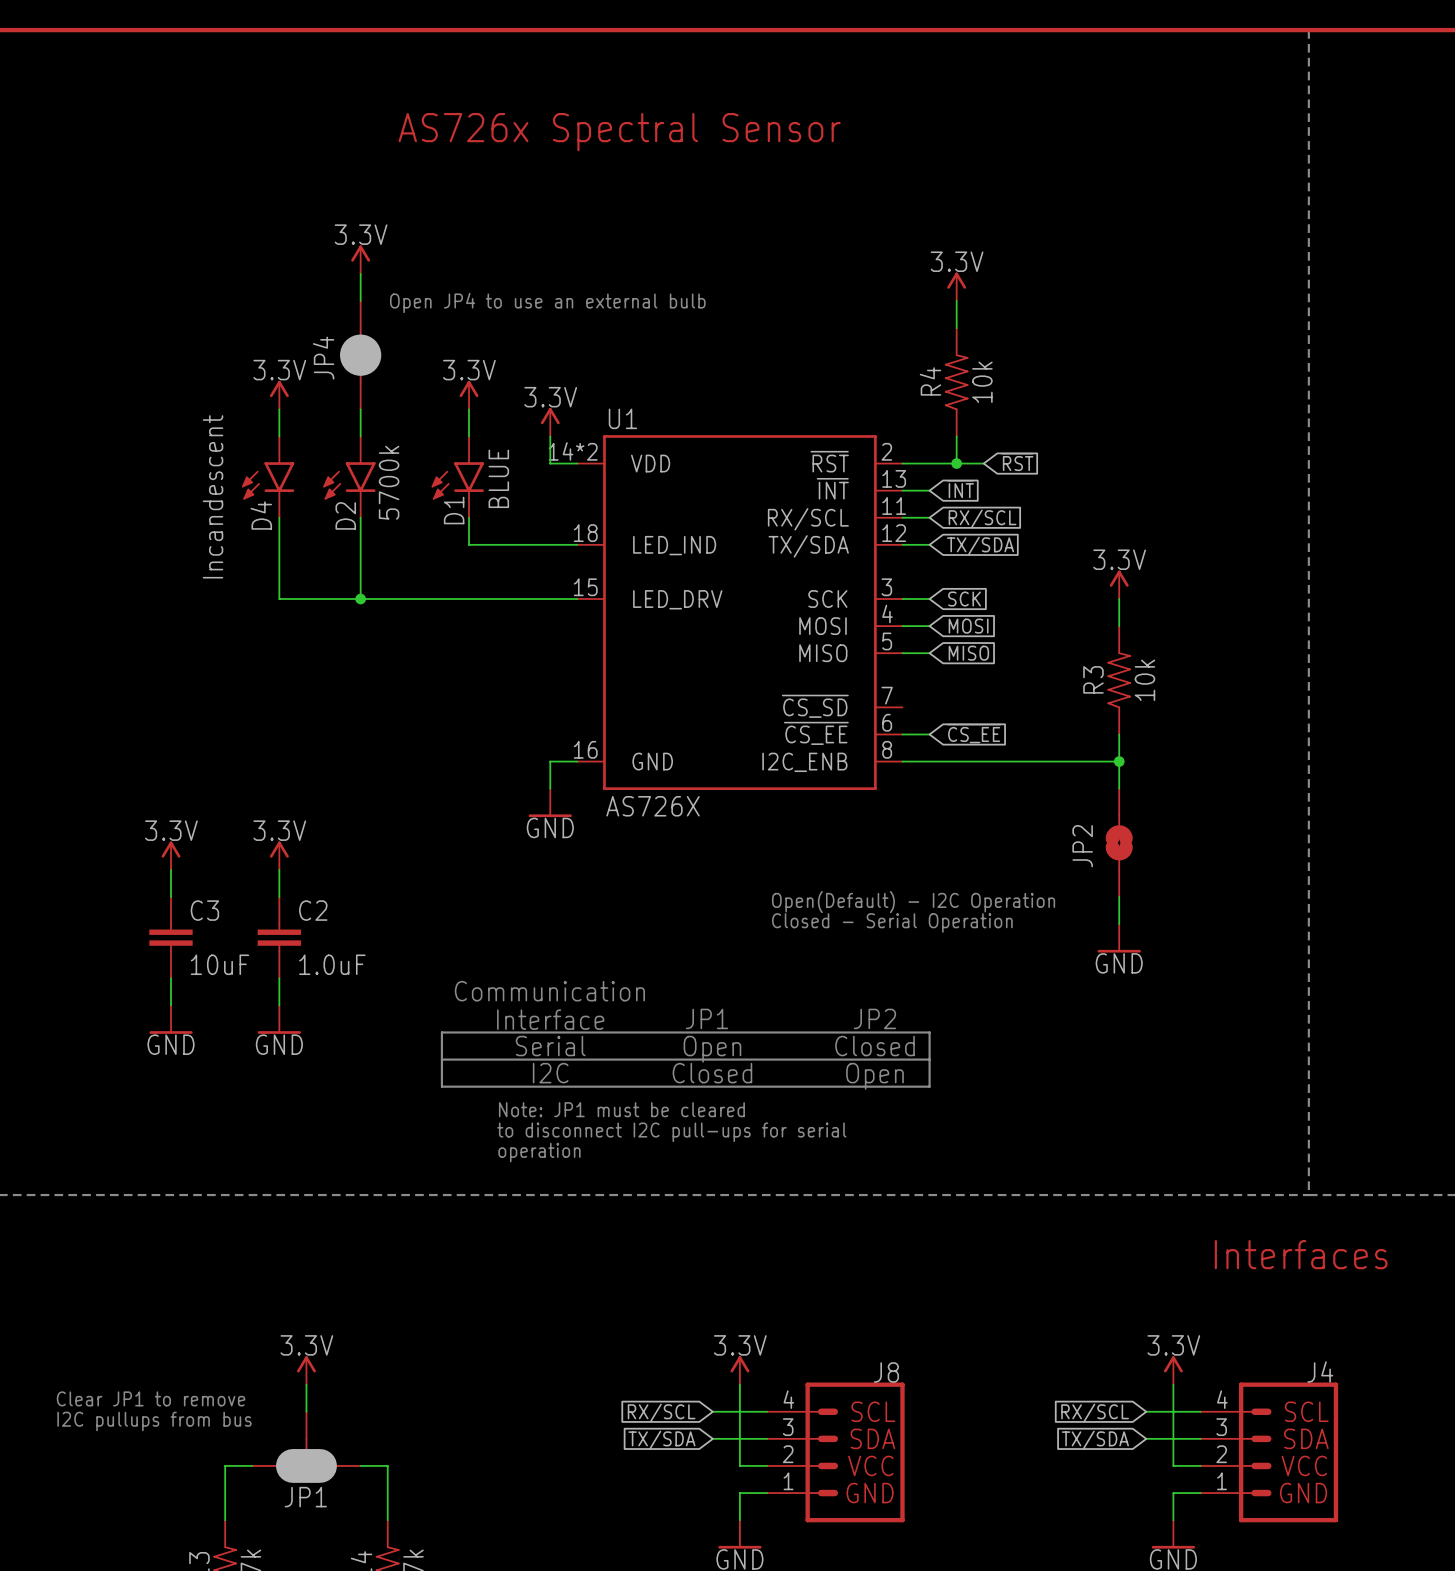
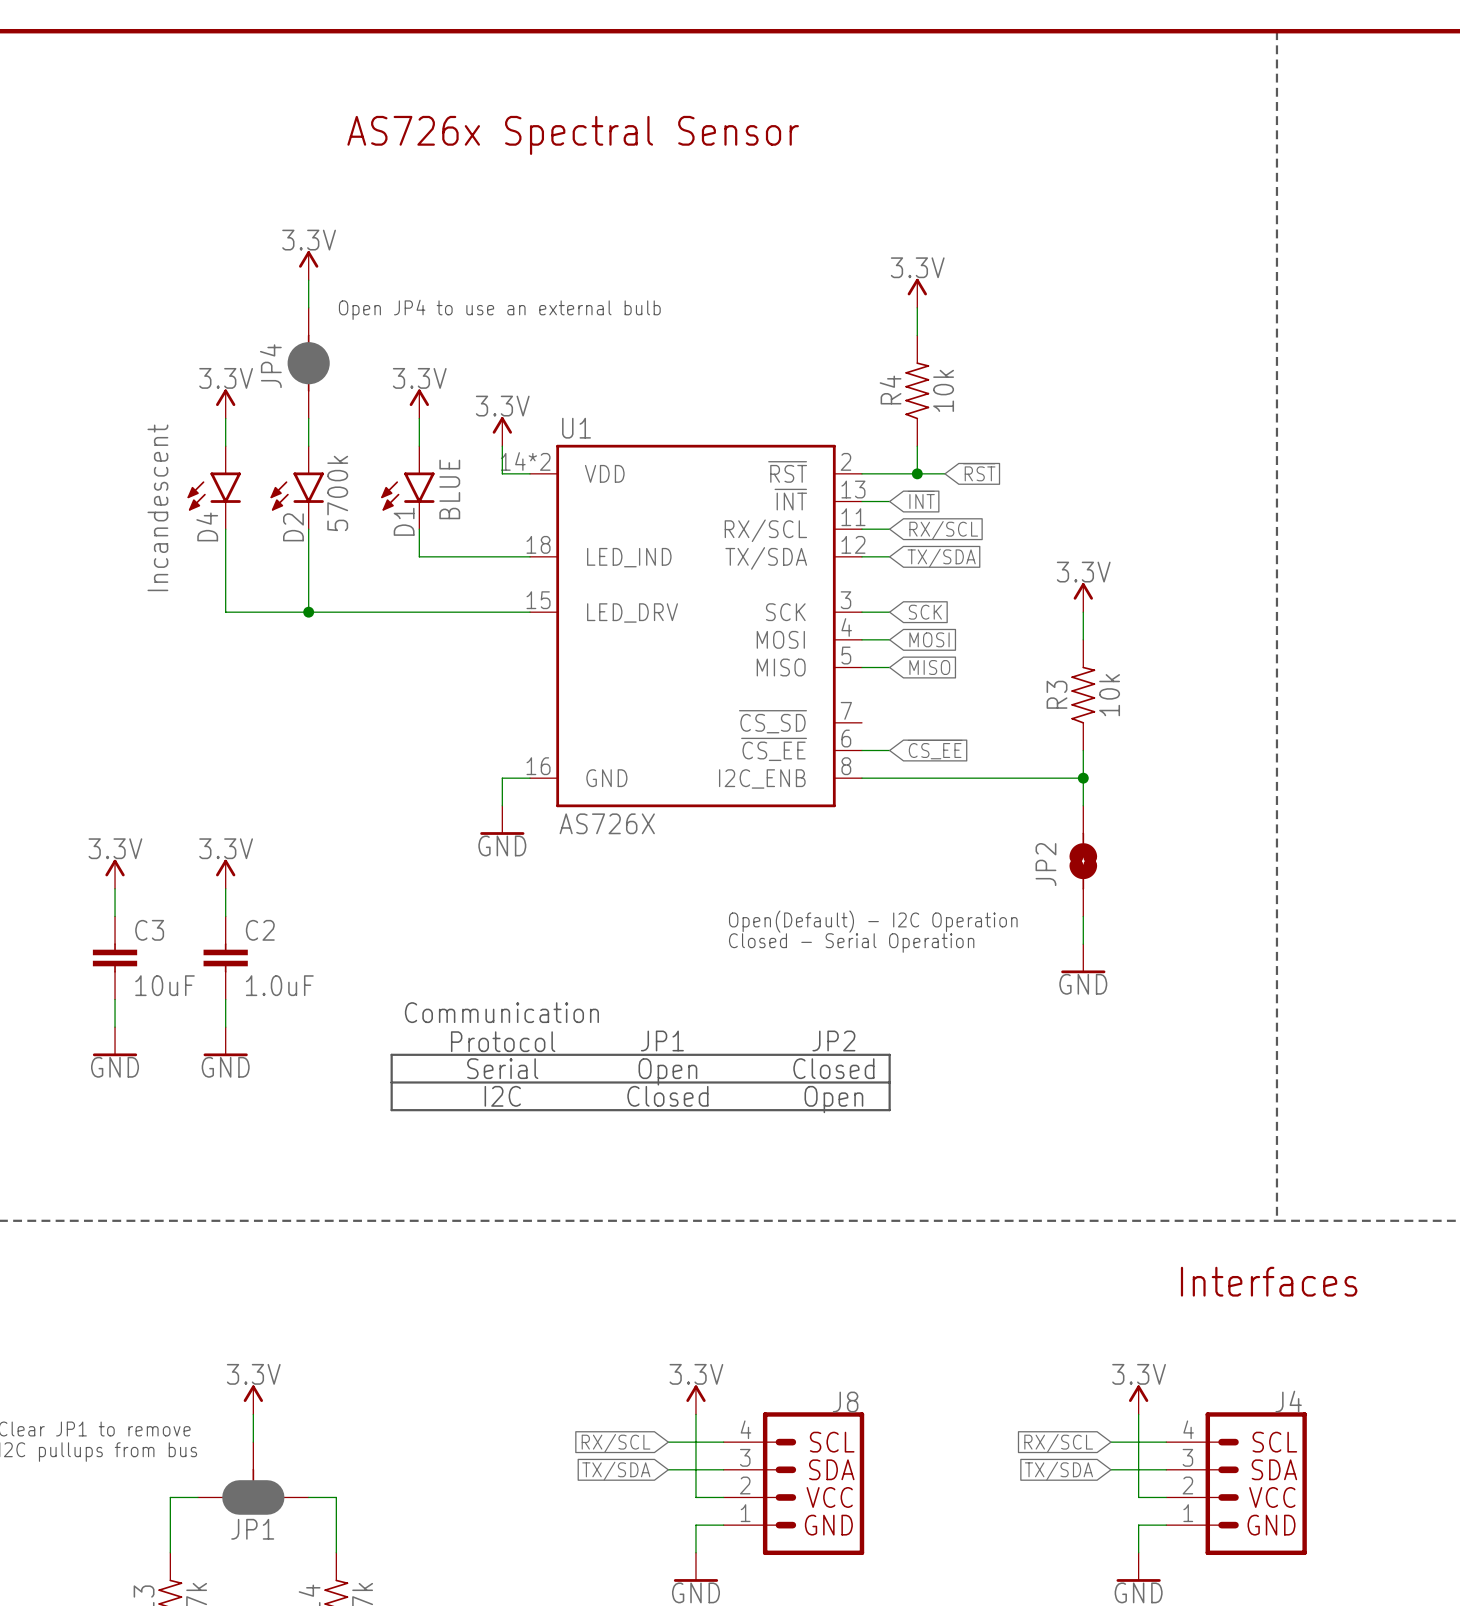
text: Interface (550, 1019) -> Protocol (503, 1041)
text: Note: JP1 must be cleared (621, 1109) -> none
text: to disconnect I2C pull-ups for serial (671, 1132) -> none
text: operation (539, 1152) -> none

